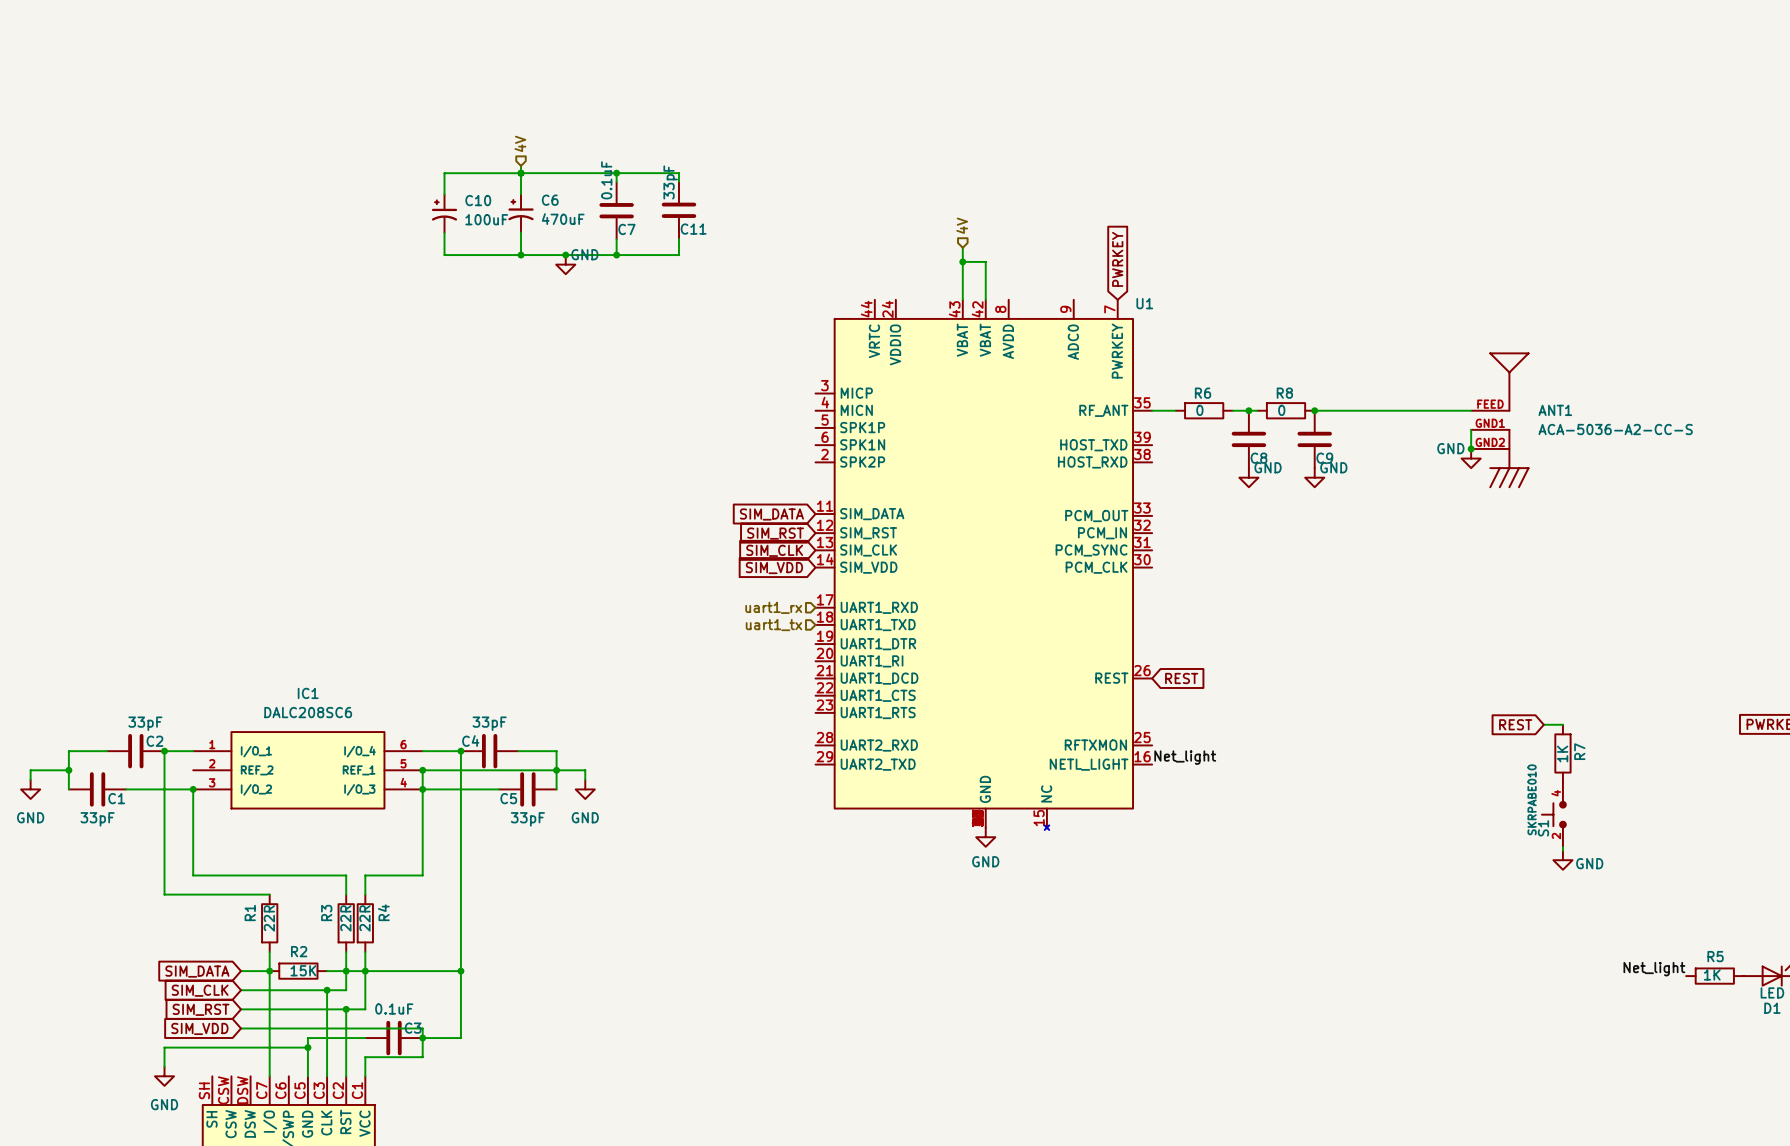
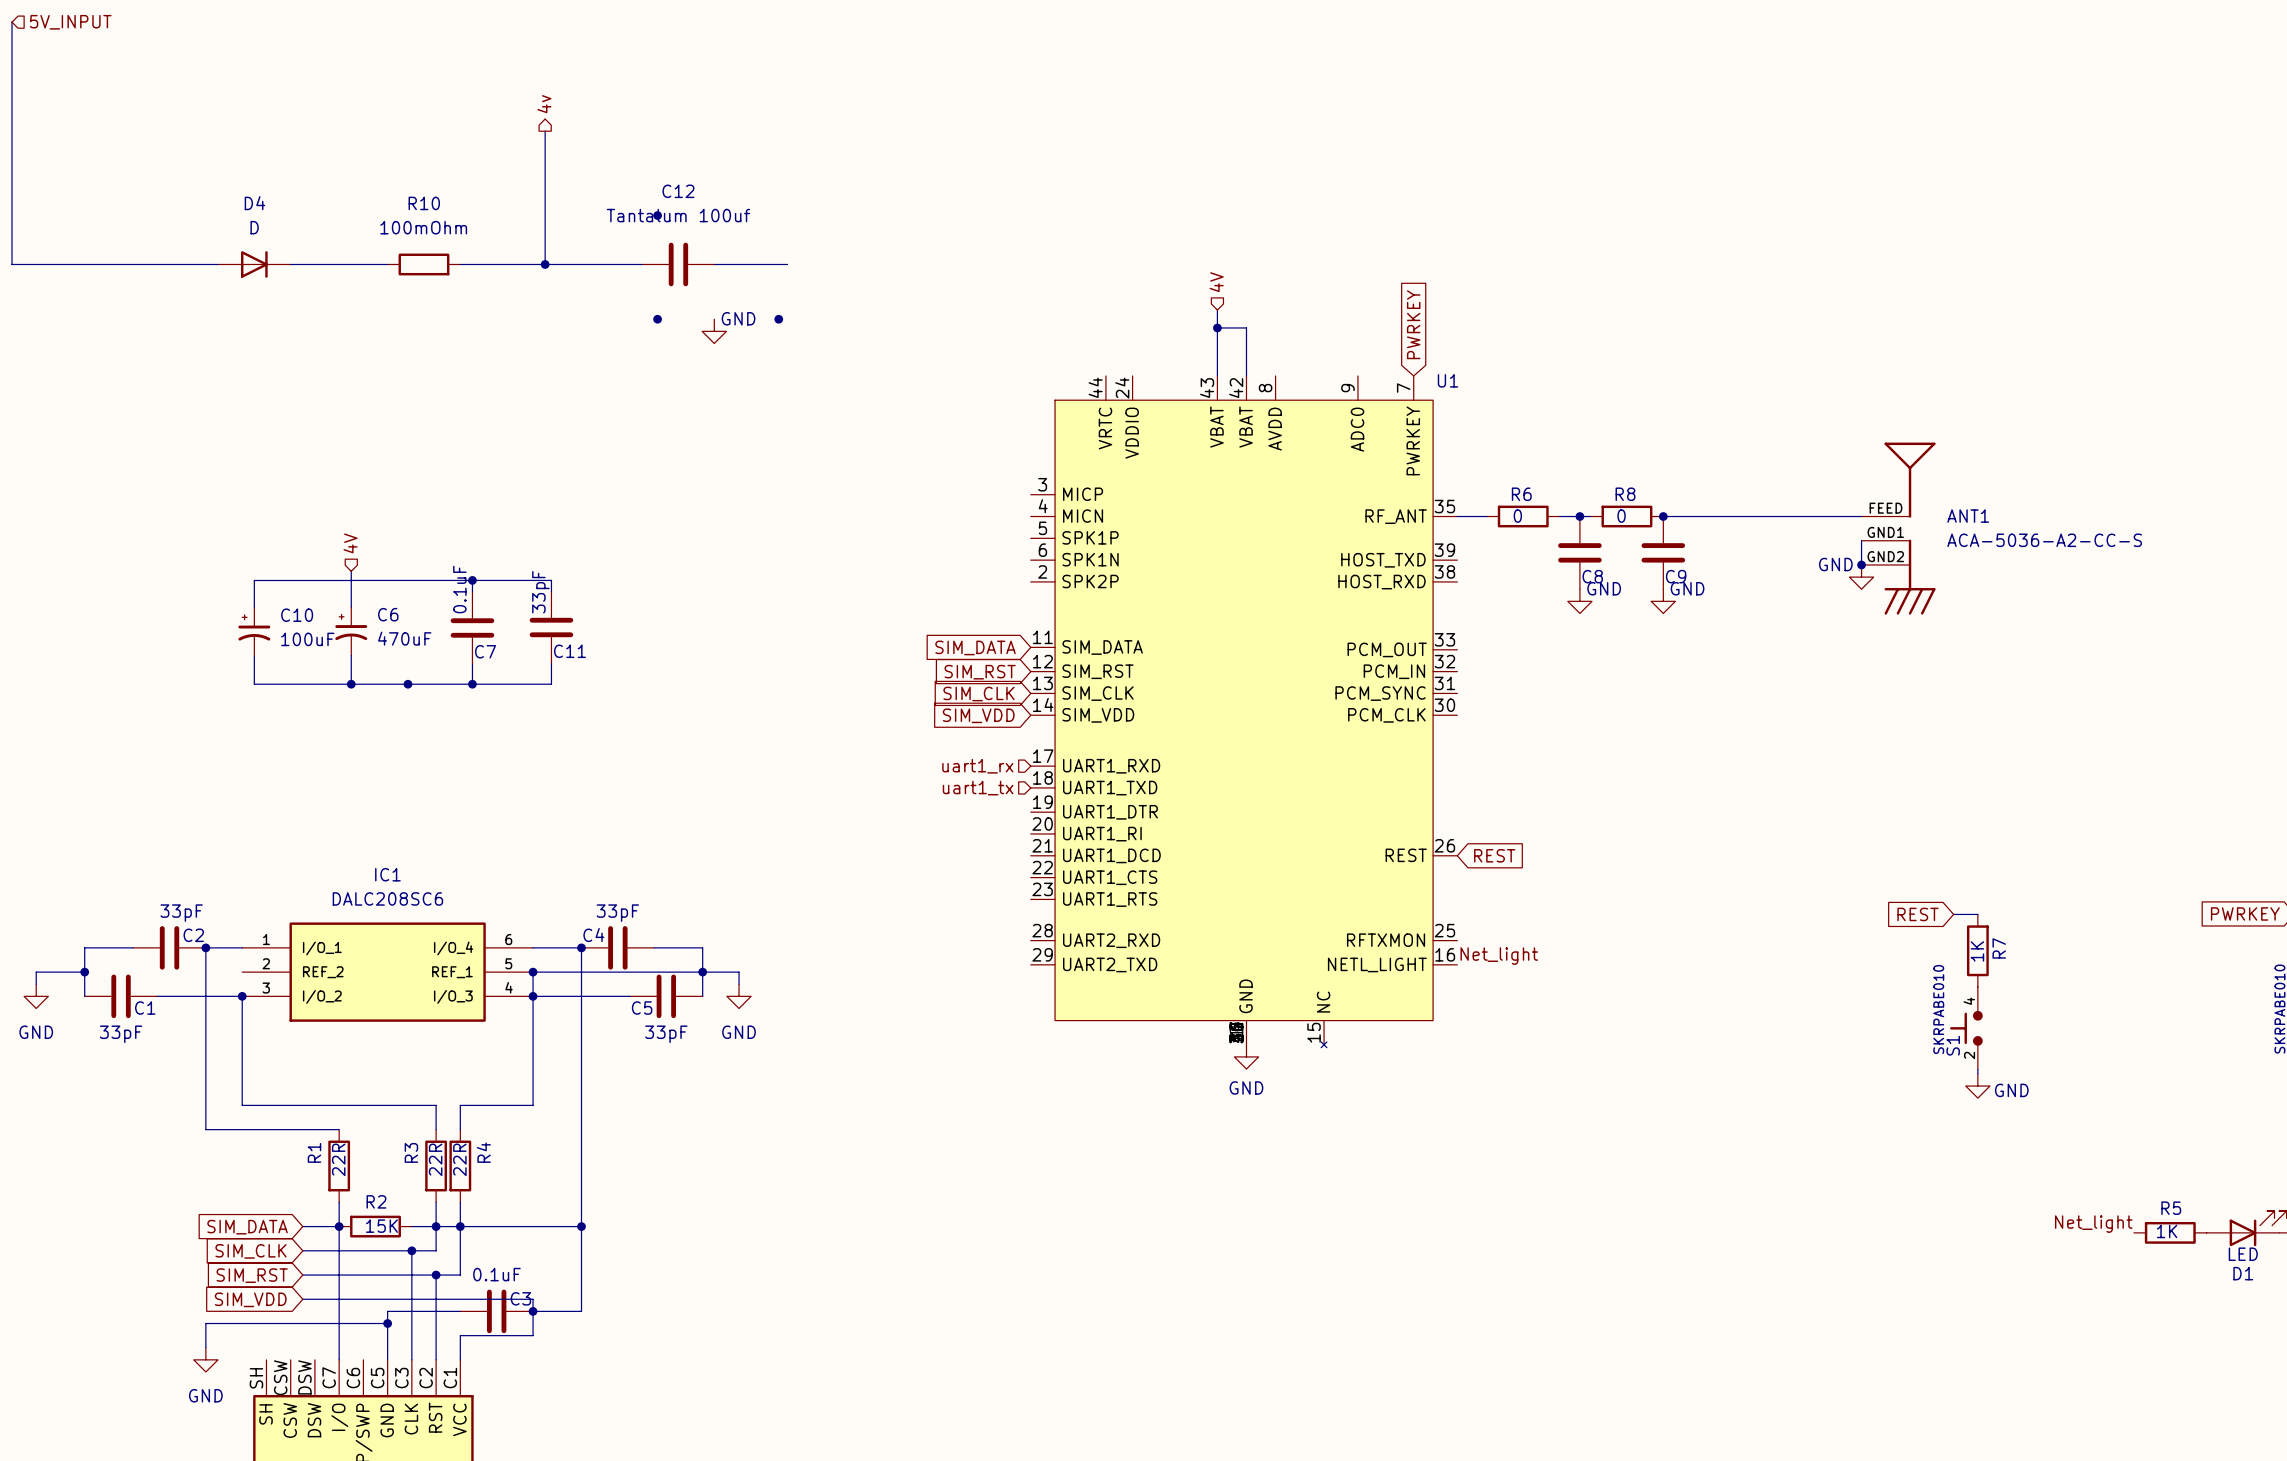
wire: none -> (12, 22) (12, 264) (217, 264)
hierarchical label: none -> 5V_INPUT (70, 22)
hierarchical label: none -> 4v (544, 104)
wire: none -> (545, 131) (545, 264)
hierarchical label: 4V (520, 143) -> none
wire: (521, 165) (521, 194) -> none
wire: (521, 173) (678, 173) (678, 181) -> none
wire: (521, 173) (444, 173) (444, 194) -> none
wire: (616, 173) (616, 181) -> none
junction: (616, 173) -> none
C7 position: (616, 210) -> (472, 627)
C11 position: (678, 210) -> (551, 627)
D4: none -> D (254, 264)
wire: none -> (290, 264) (387, 264)
R10: none -> 100mOhm (423, 264)
wire: none -> (460, 264) (642, 264)
junction: none -> (545, 264)
C12: none -> Tantalum 100uf (678, 264)
wire: none -> (714, 264) (787, 264)
C10 position: (444, 213) -> (254, 631)
C6 position: (521, 213) -> (351, 631)
wire: (444, 232) (444, 255) (678, 255) (678, 238) -> none
wire: (521, 232) (521, 255) -> none
wire: (616, 239) (616, 255) -> none
junction: (565, 255) -> none
hierarchical label: none -> 4V (350, 543)
wire: none -> (351, 571) (351, 607)
wire: none -> (351, 580) (551, 580) (551, 591)
wire: none -> (351, 580) (254, 580) (254, 607)
wire: none -> (472, 580) (472, 591)
junction: none -> (472, 580)
wire: none -> (254, 656) (254, 684) (551, 684) (551, 663)
wire: none -> (351, 655) (351, 684)
wire: none -> (472, 664) (472, 684)
junction: none -> (351, 684)
junction: none -> (407, 684)
junction: none -> (472, 684)

